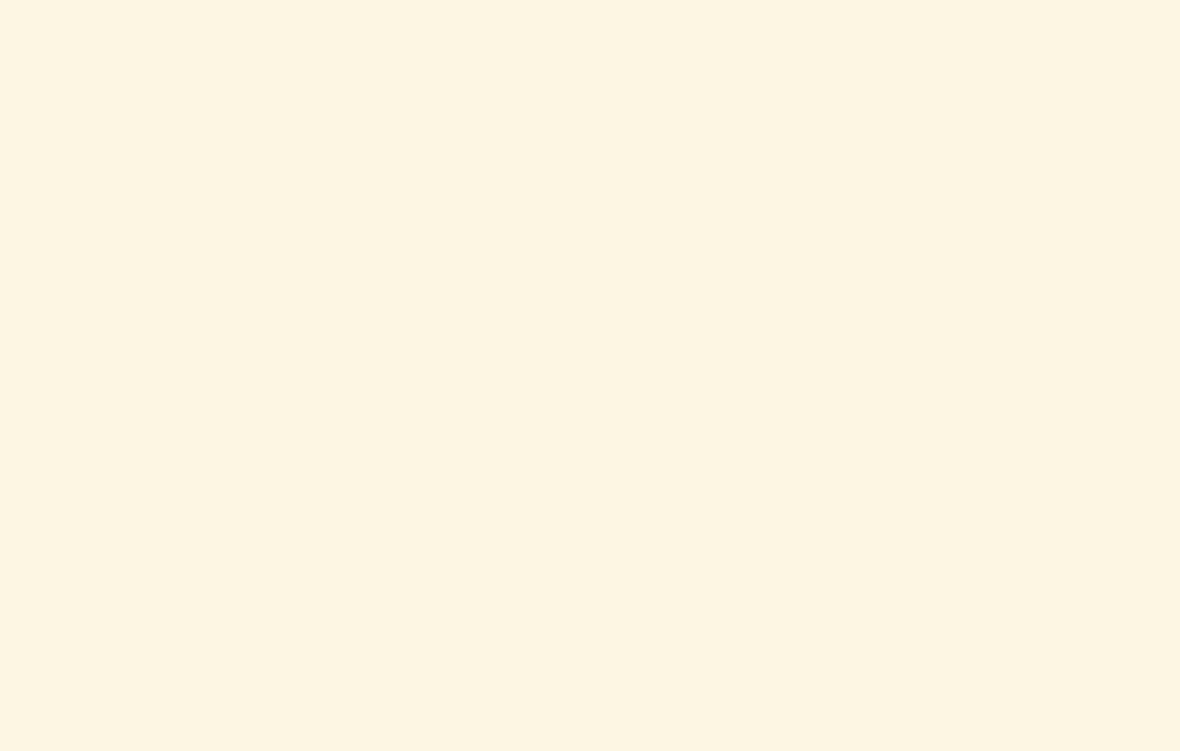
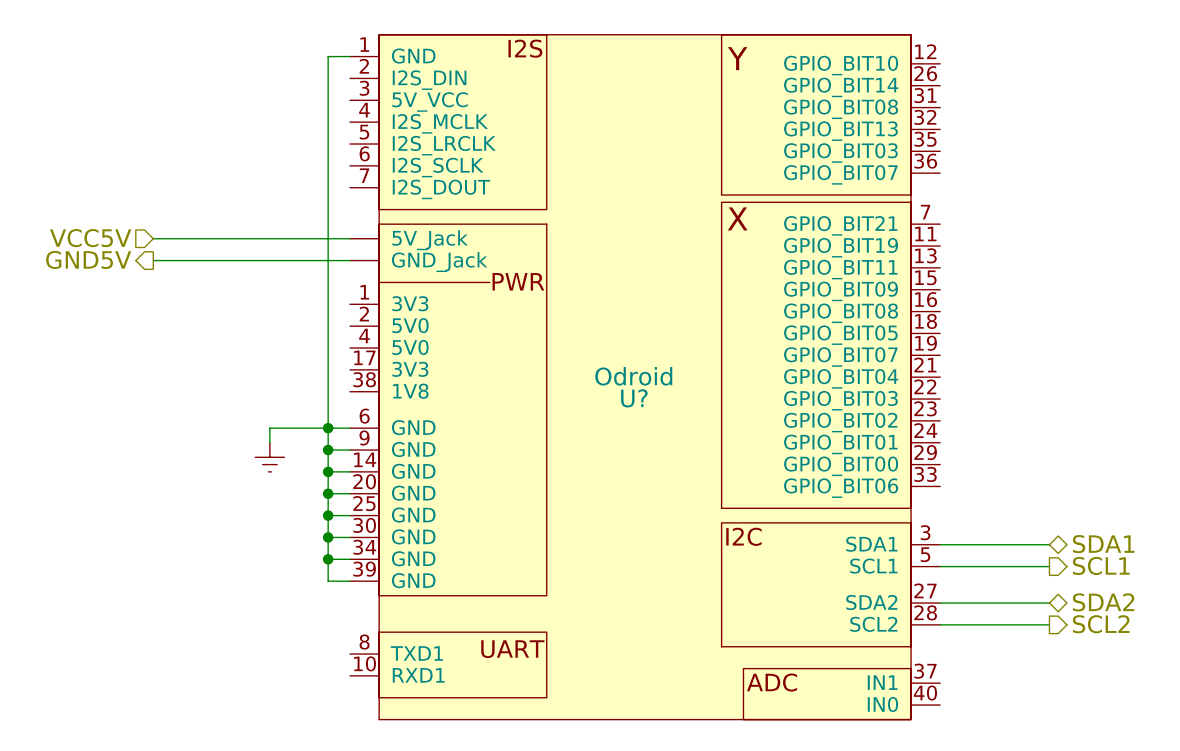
wire: none -> (350, 56) (328, 56) (328, 581) (350, 581)
hierarchical label: none -> VCC5V (90, 238)
wire: none -> (153, 238) (350, 238)
hierarchical label: none -> GND5V (88, 259)
wire: none -> (153, 260) (350, 260)
U?: none -> Odroid (645, 377)
junction: none -> (328, 428)
wire: none -> (350, 428) (269, 428) (269, 442)
wire: none -> (328, 450) (350, 450)
junction: none -> (328, 450)
power symbol: none -> (269, 457)
wire: none -> (328, 471) (350, 471)
junction: none -> (328, 471)
wire: none -> (328, 493) (350, 493)
junction: none -> (328, 493)
wire: none -> (328, 515) (350, 515)
junction: none -> (328, 515)
wire: none -> (328, 537) (350, 537)
junction: none -> (328, 537)
wire: none -> (940, 544) (1049, 544)
hierarchical label: none -> SDA1 (1103, 544)
wire: none -> (328, 559) (350, 559)
junction: none -> (328, 559)
hierarchical label: none -> SCL1 (1101, 565)
wire: none -> (940, 566) (1049, 566)
hierarchical label: none -> SDA2 (1103, 602)
wire: none -> (940, 603) (1049, 603)
wire: none -> (940, 624) (1049, 624)
hierarchical label: none -> SCL2 (1101, 624)

